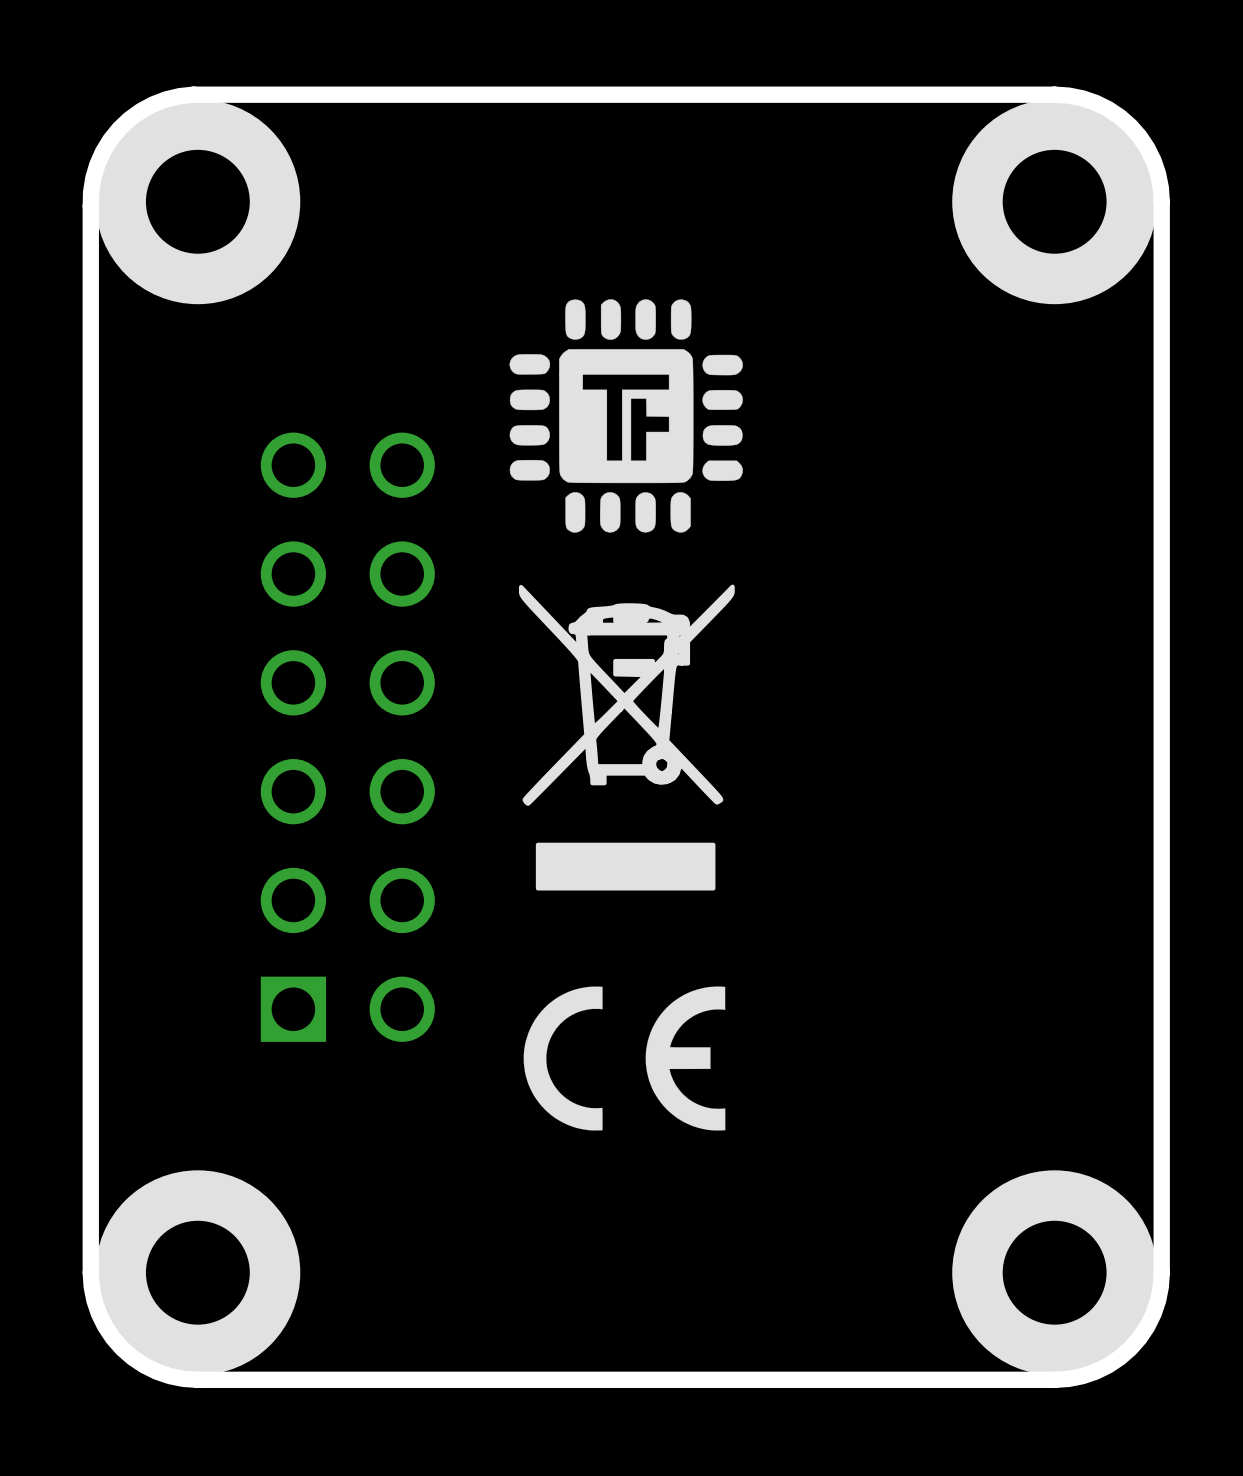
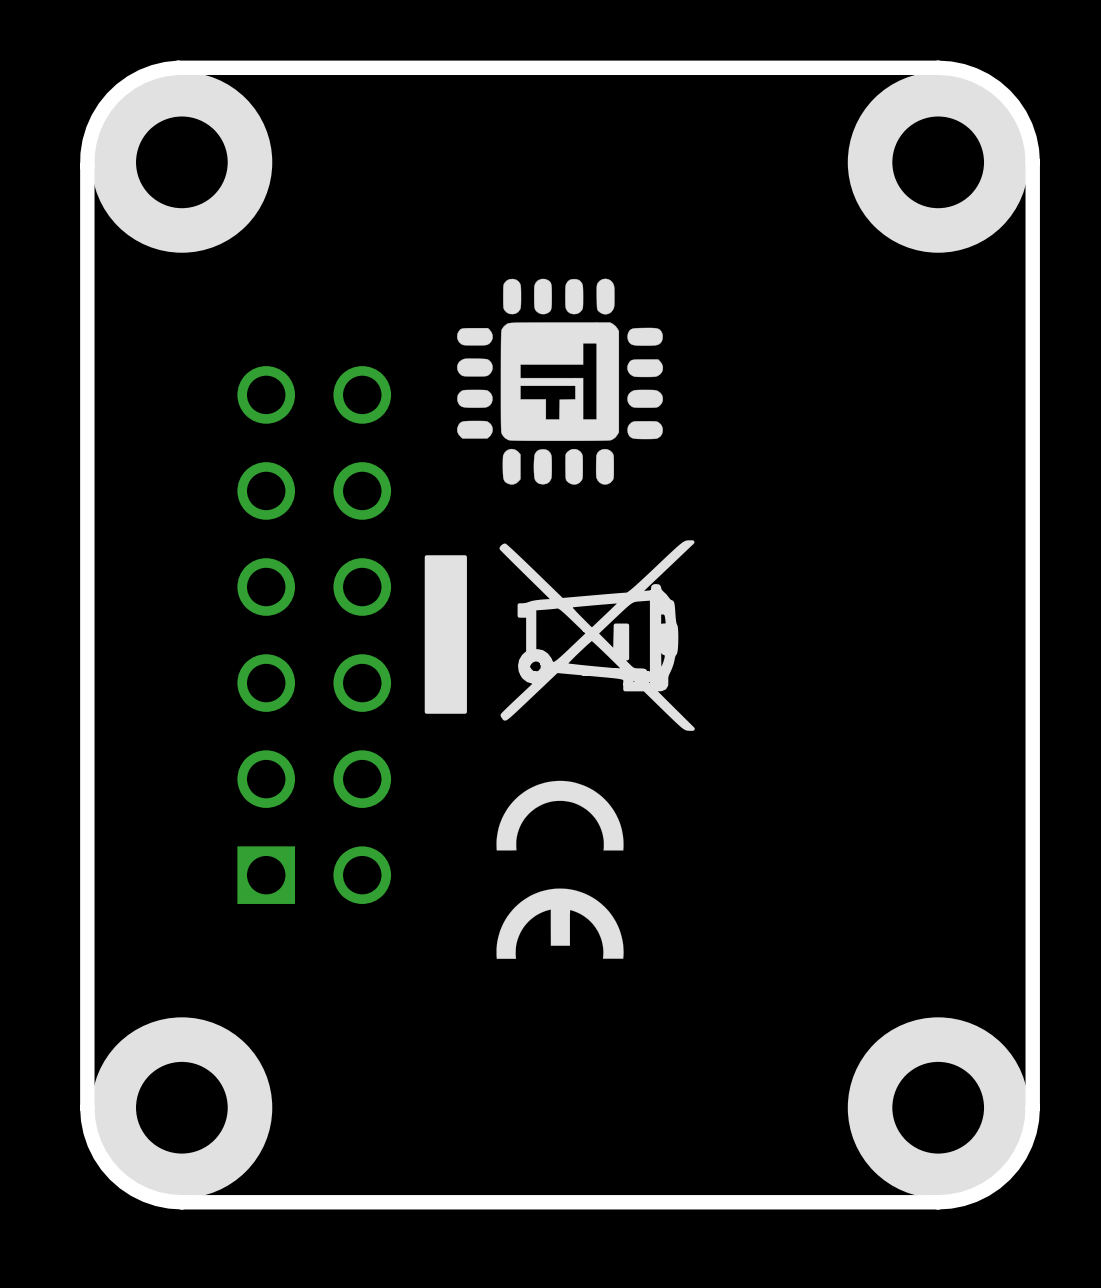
drawing shape: [509, 299, 743, 533] -> [456, 278, 664, 485]
drawing shape: [518, 584, 735, 891] -> [424, 540, 695, 731]
drawing: none -> [496, 780, 624, 959]
drawing: [523, 986, 726, 1131] -> none

